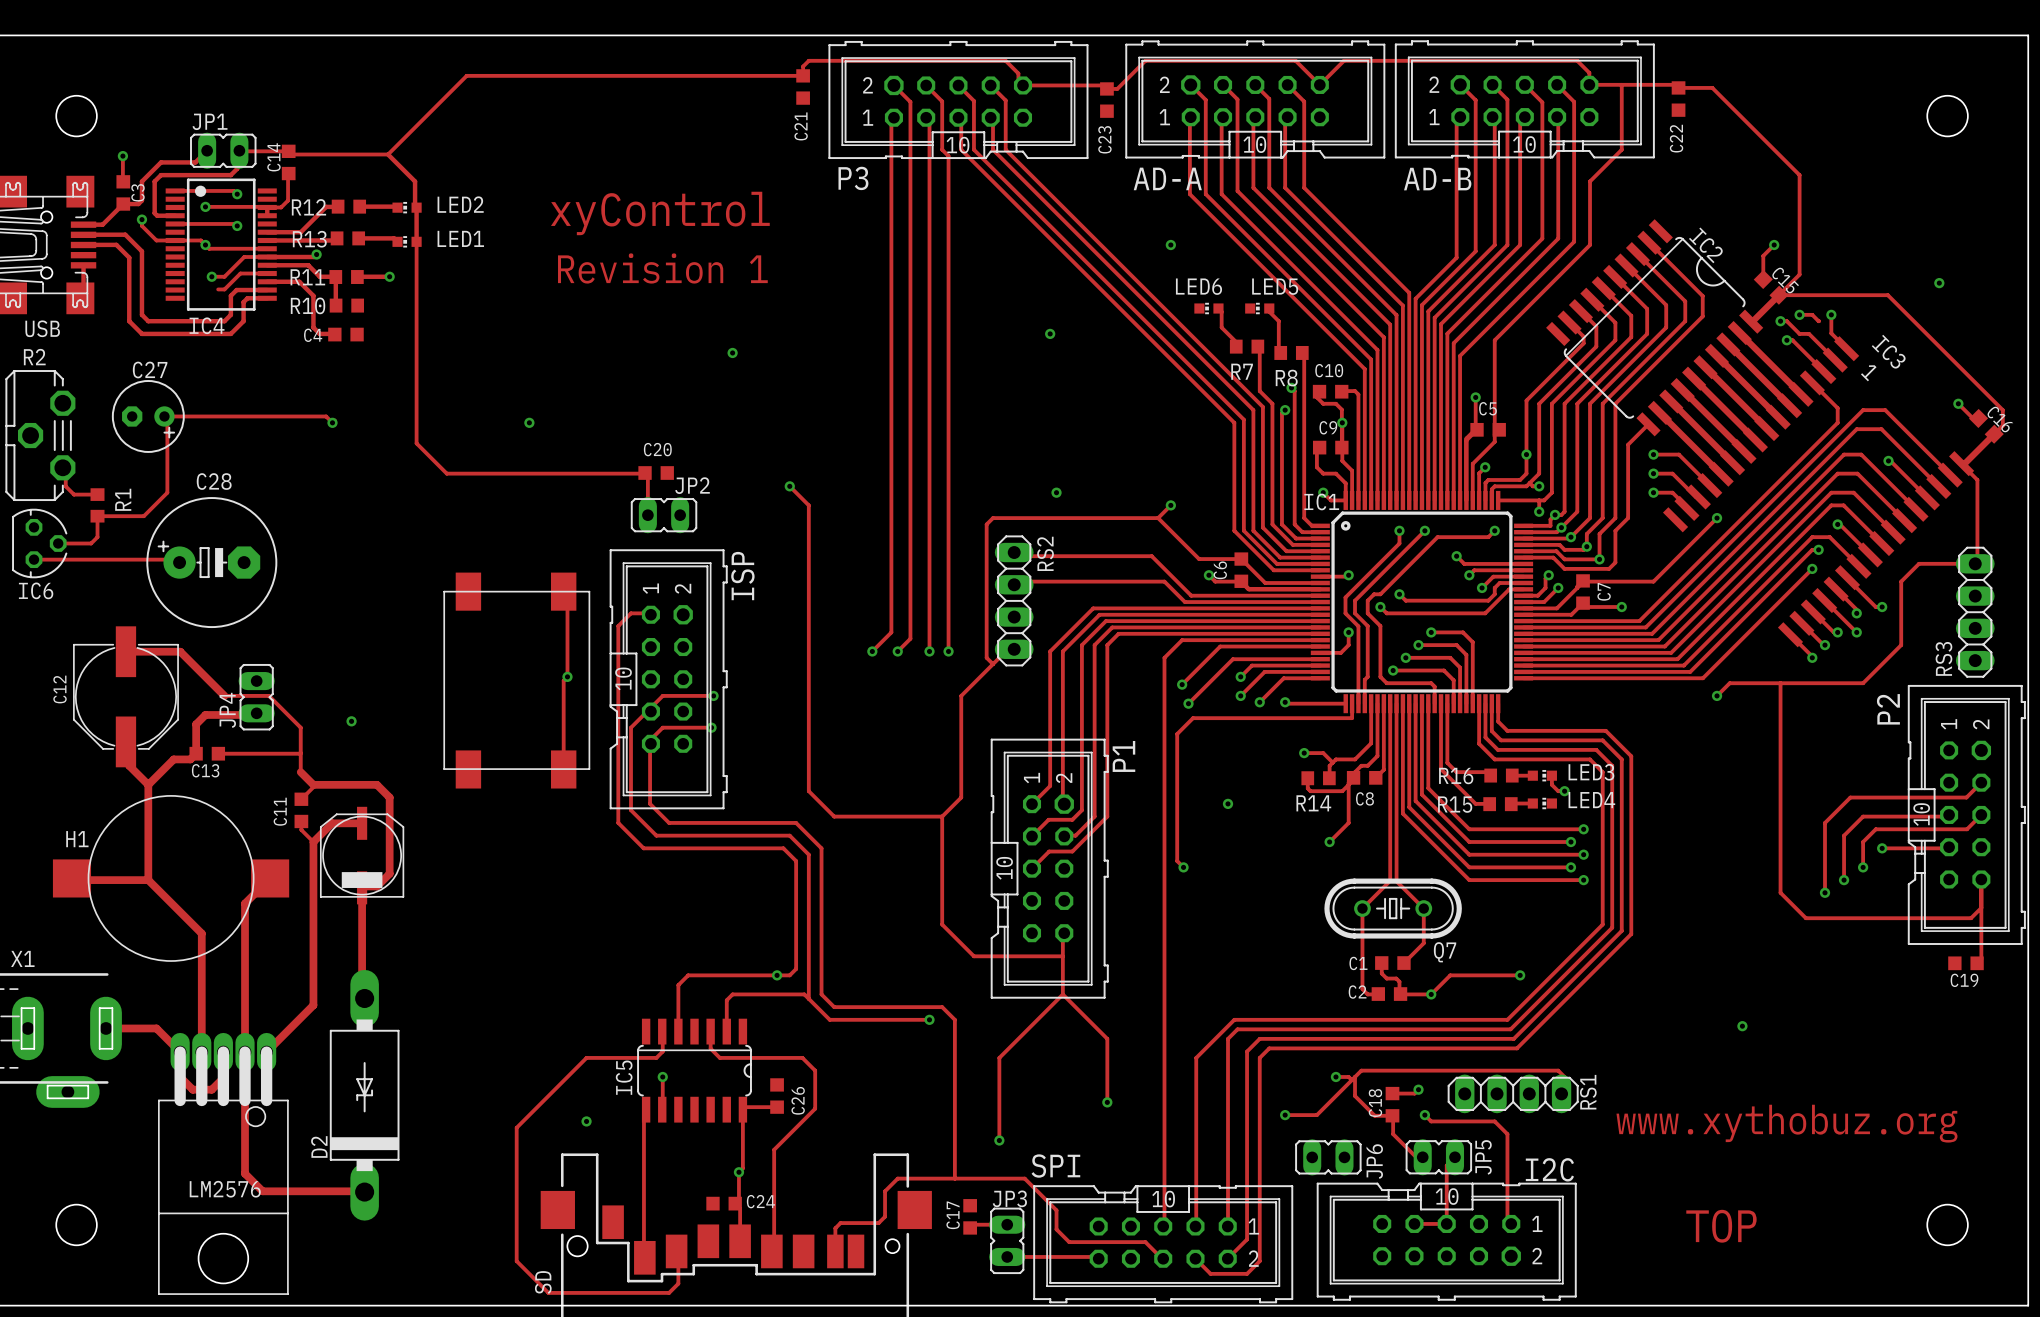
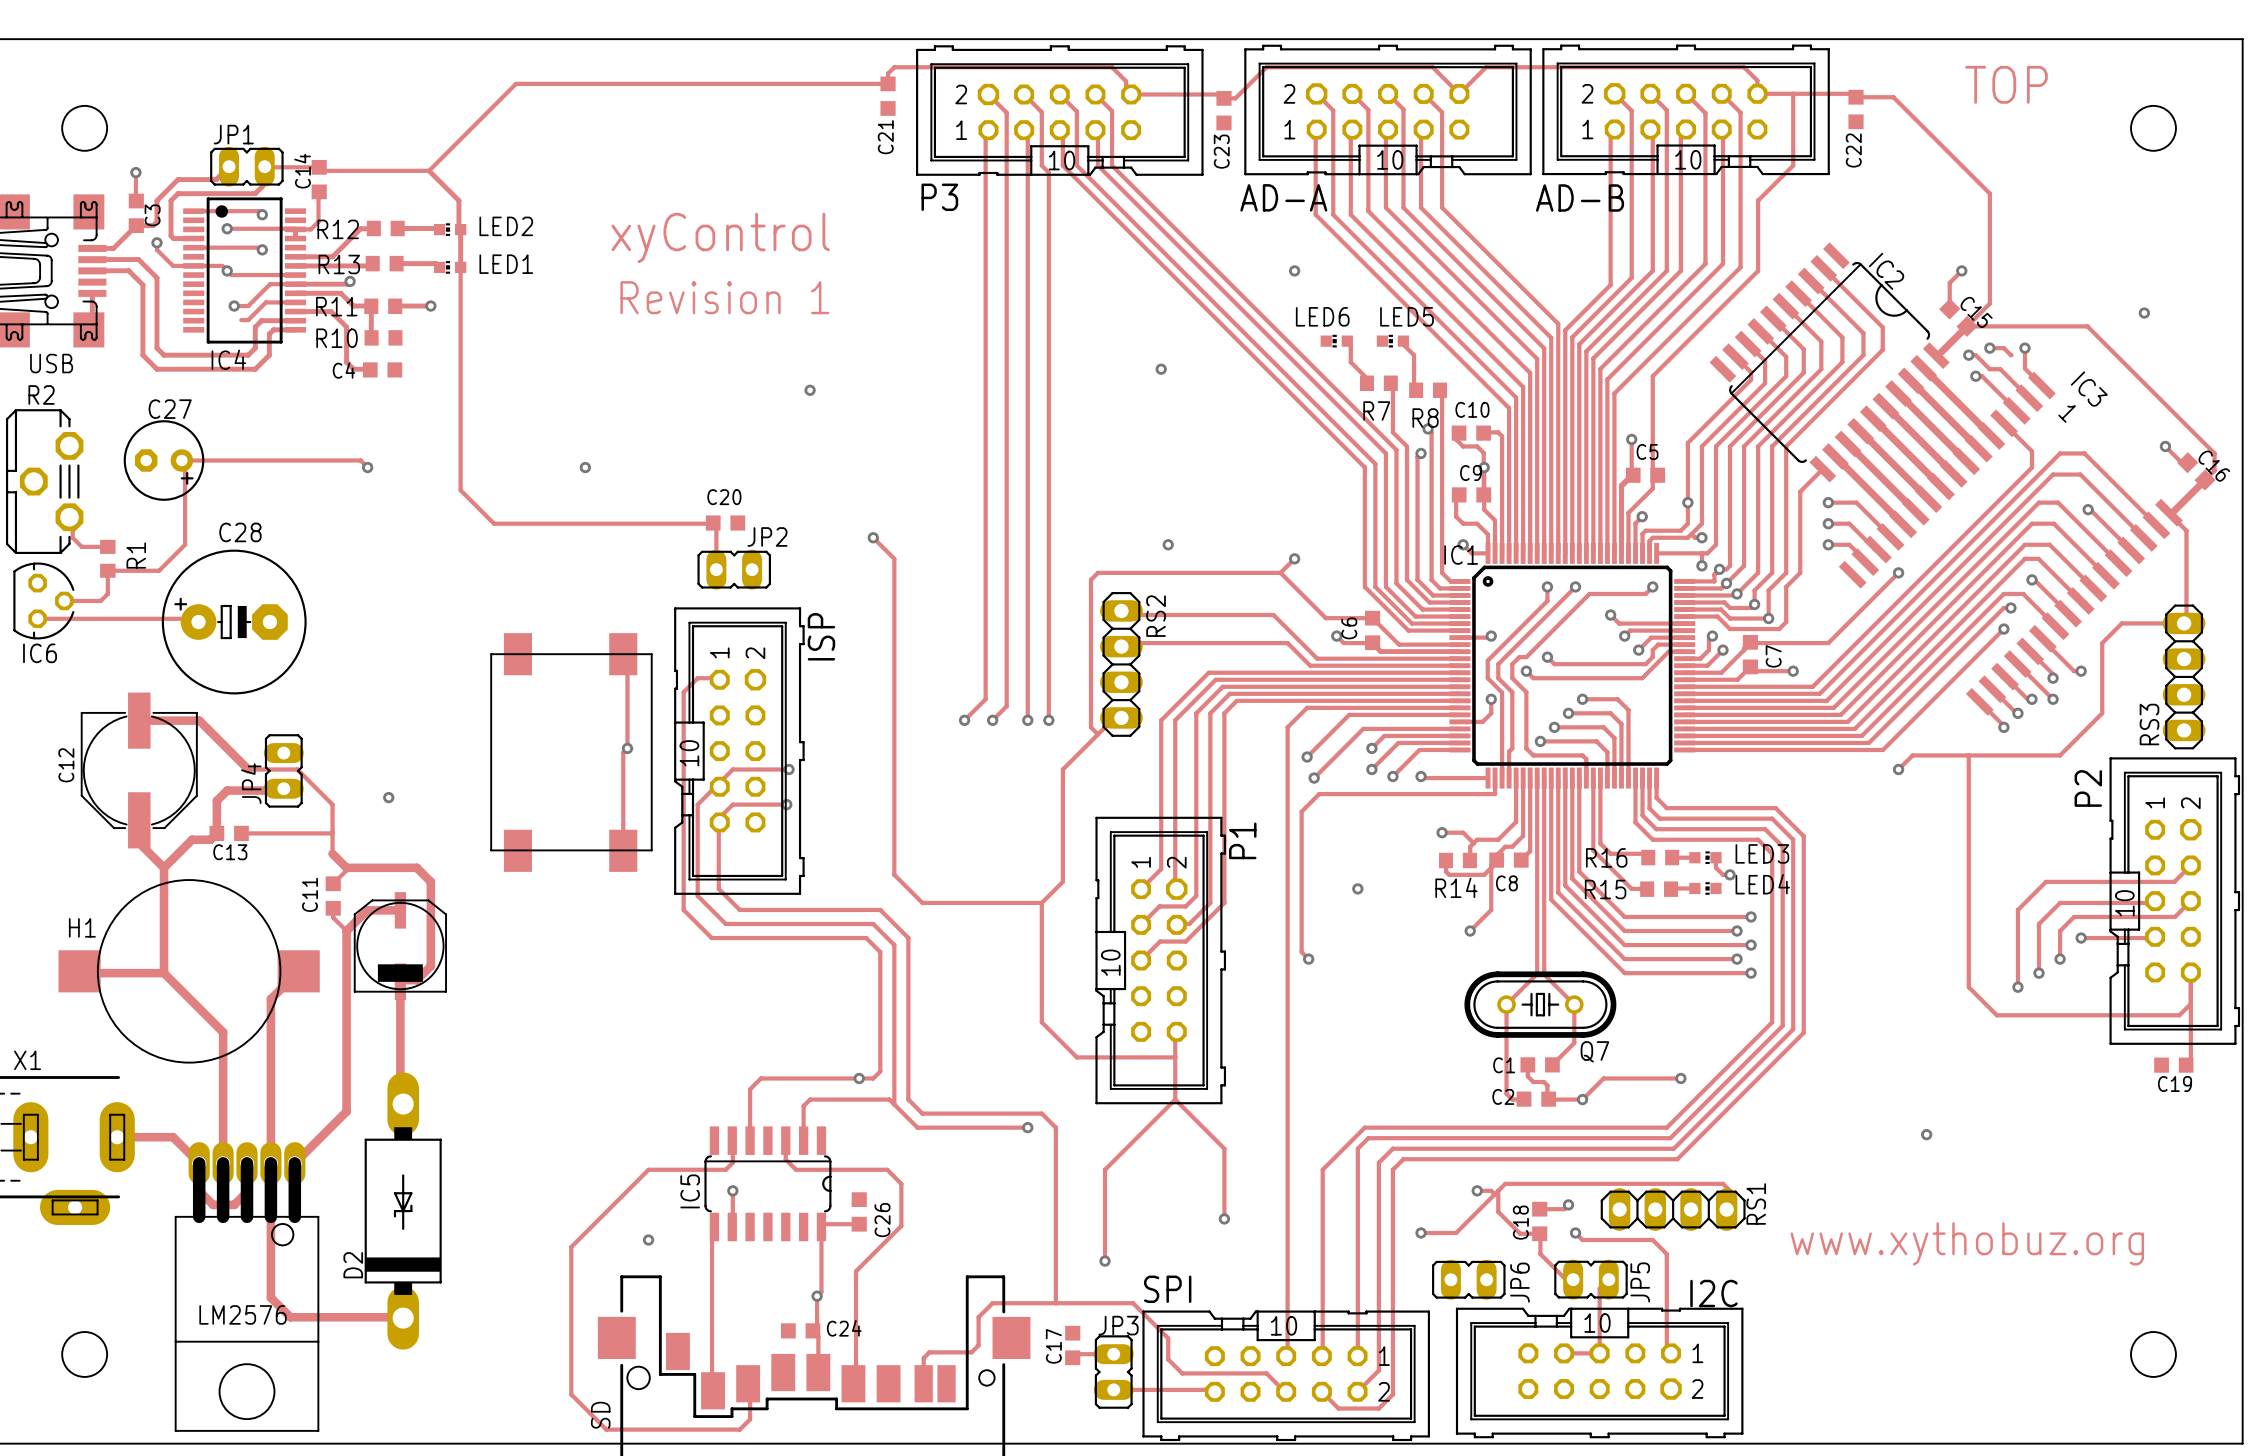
text: none -> TOP (2006, 84)
text: TOP (1721, 1226) -> none

